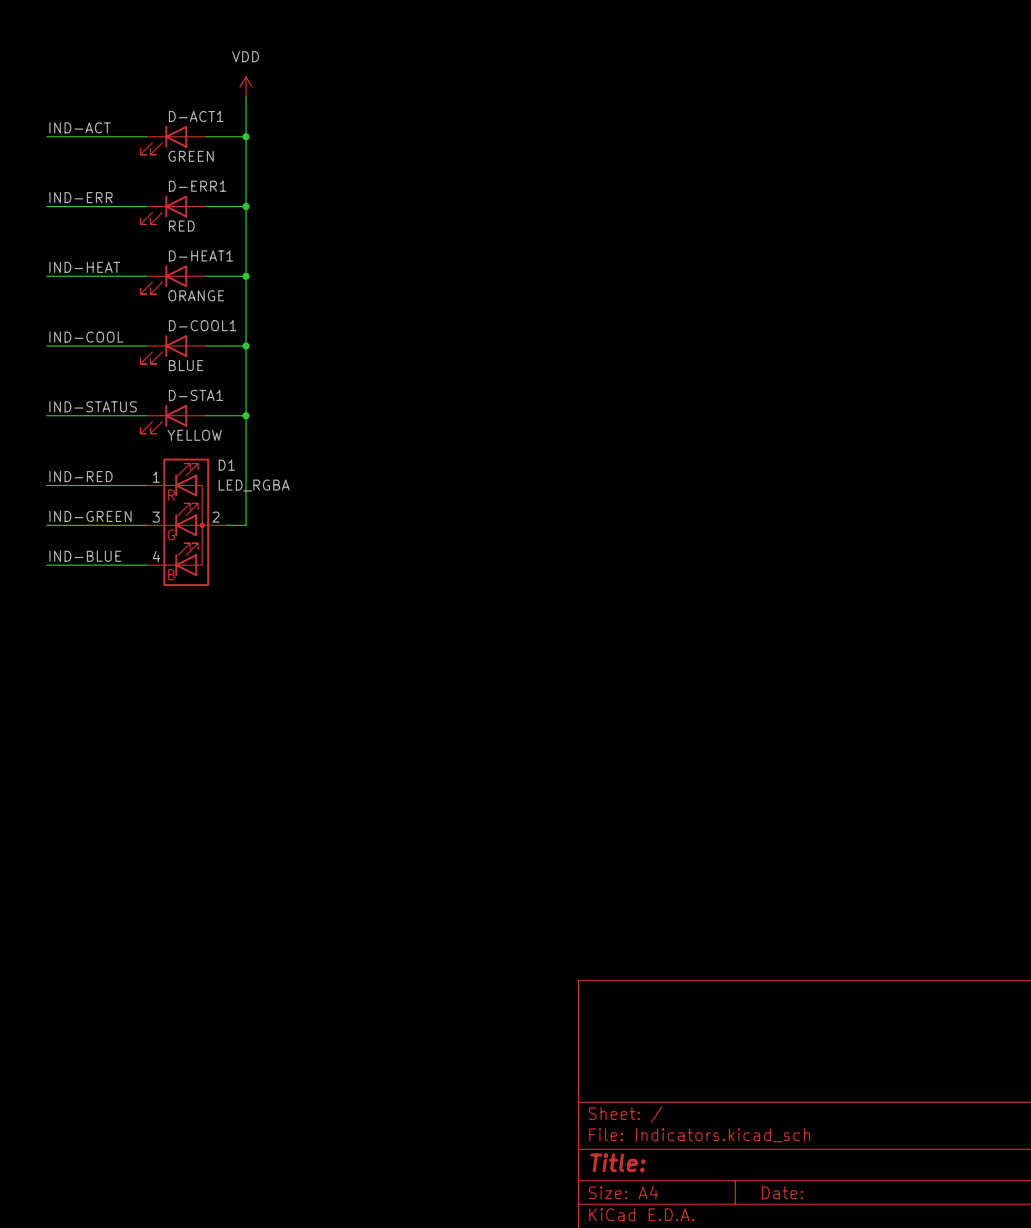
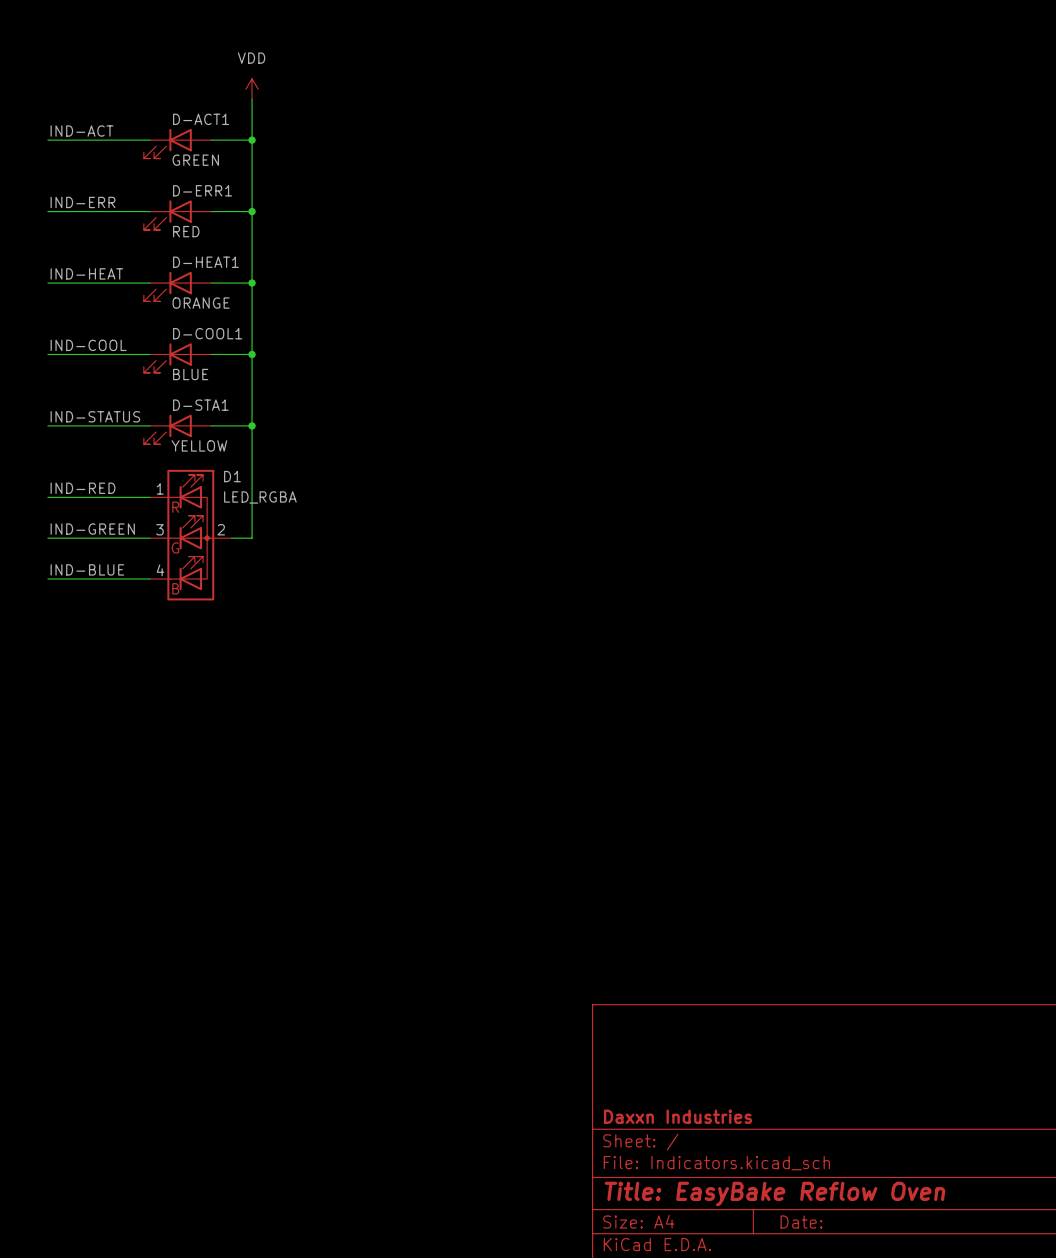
title block: none -> Daxxn Industries (678, 1116)
title block: Title: (617, 1162) -> Title: EasyBake Reflow Oven (774, 1194)

